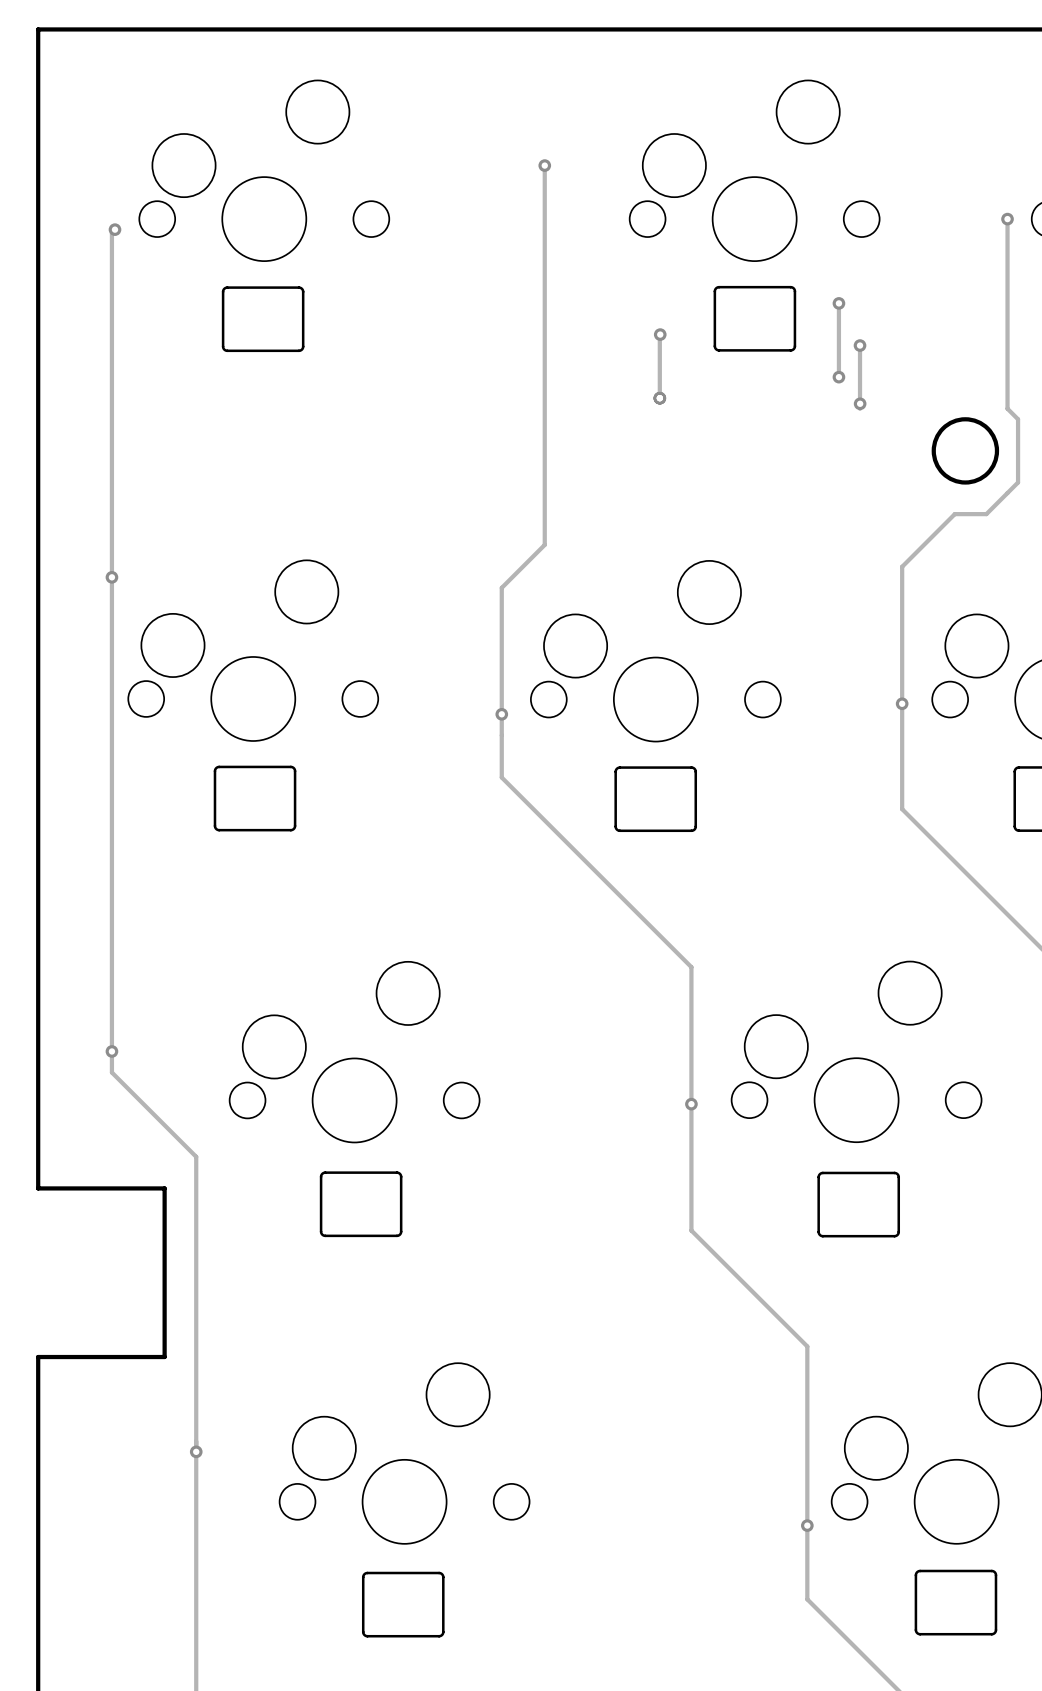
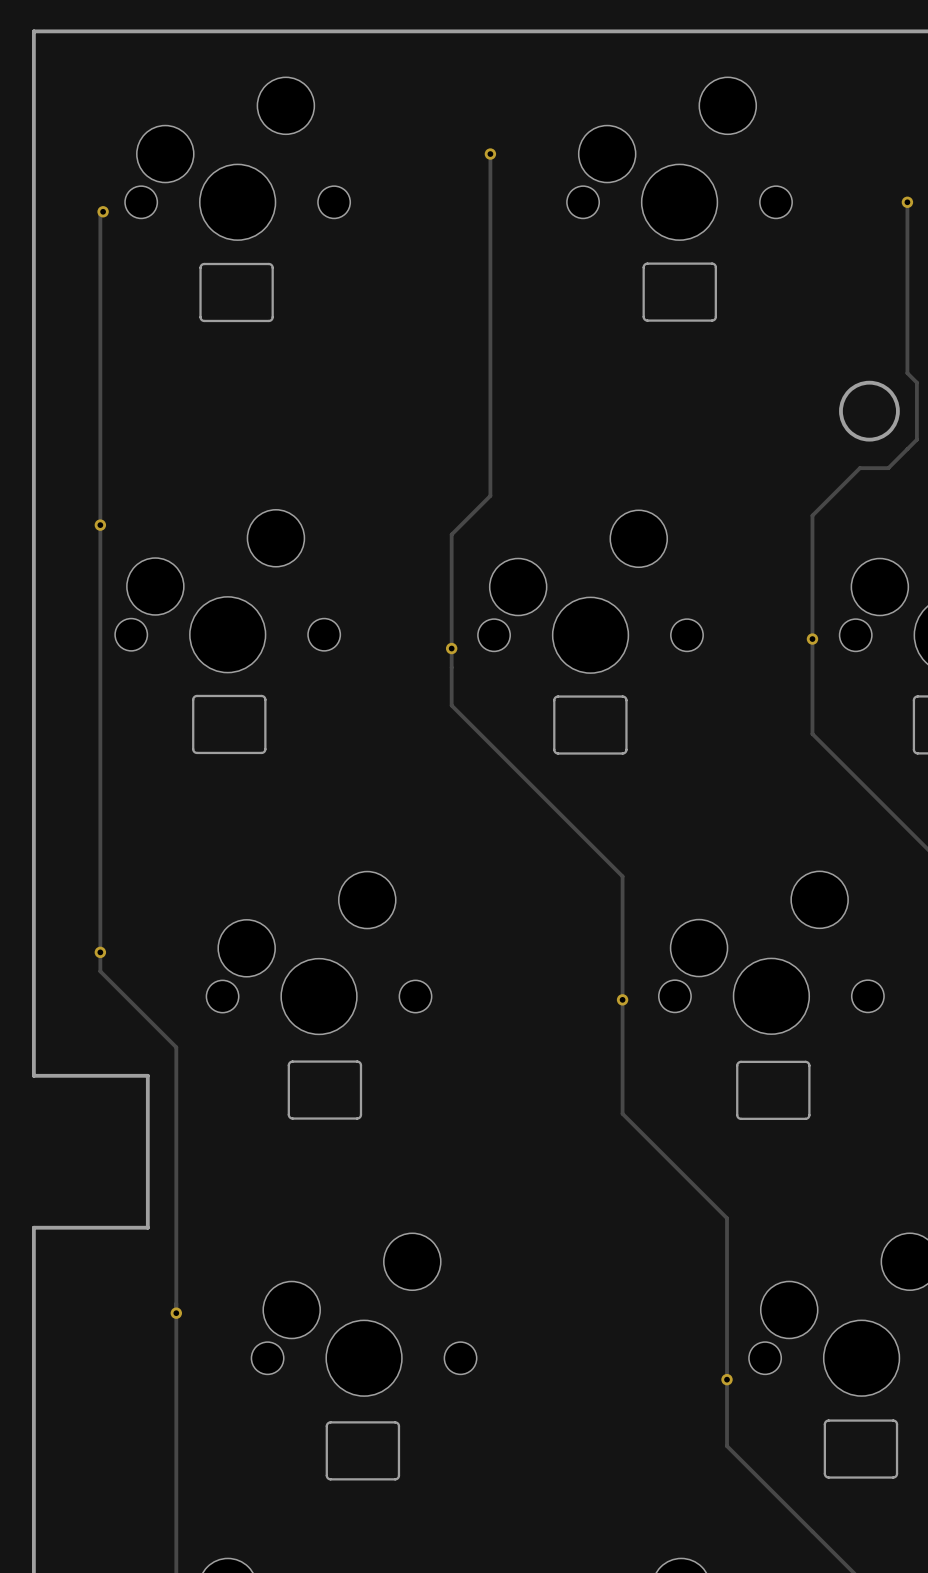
track: (838, 303) (838, 377) -> none
via: (838, 303) -> none
track: (660, 334) (659, 398) -> none
via: (660, 334) -> none
track: (860, 345) (860, 408) -> none
via: (860, 345) -> none
via: (838, 377) -> none
via: (659, 398) -> none
via: (860, 403) -> none

